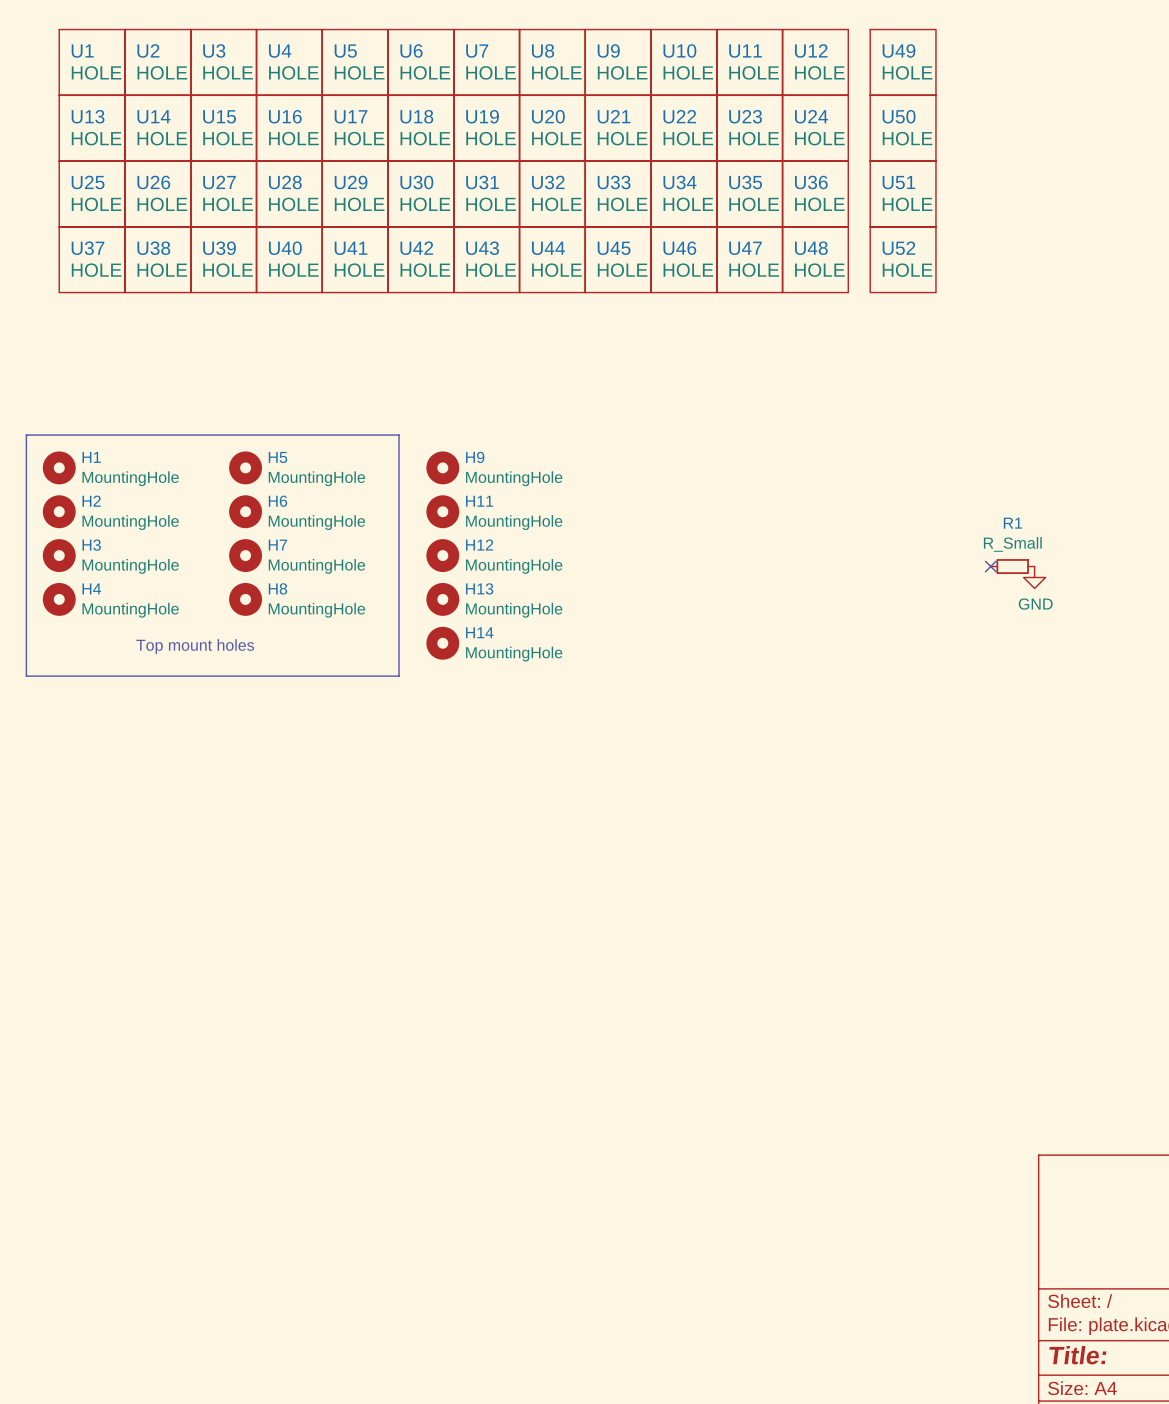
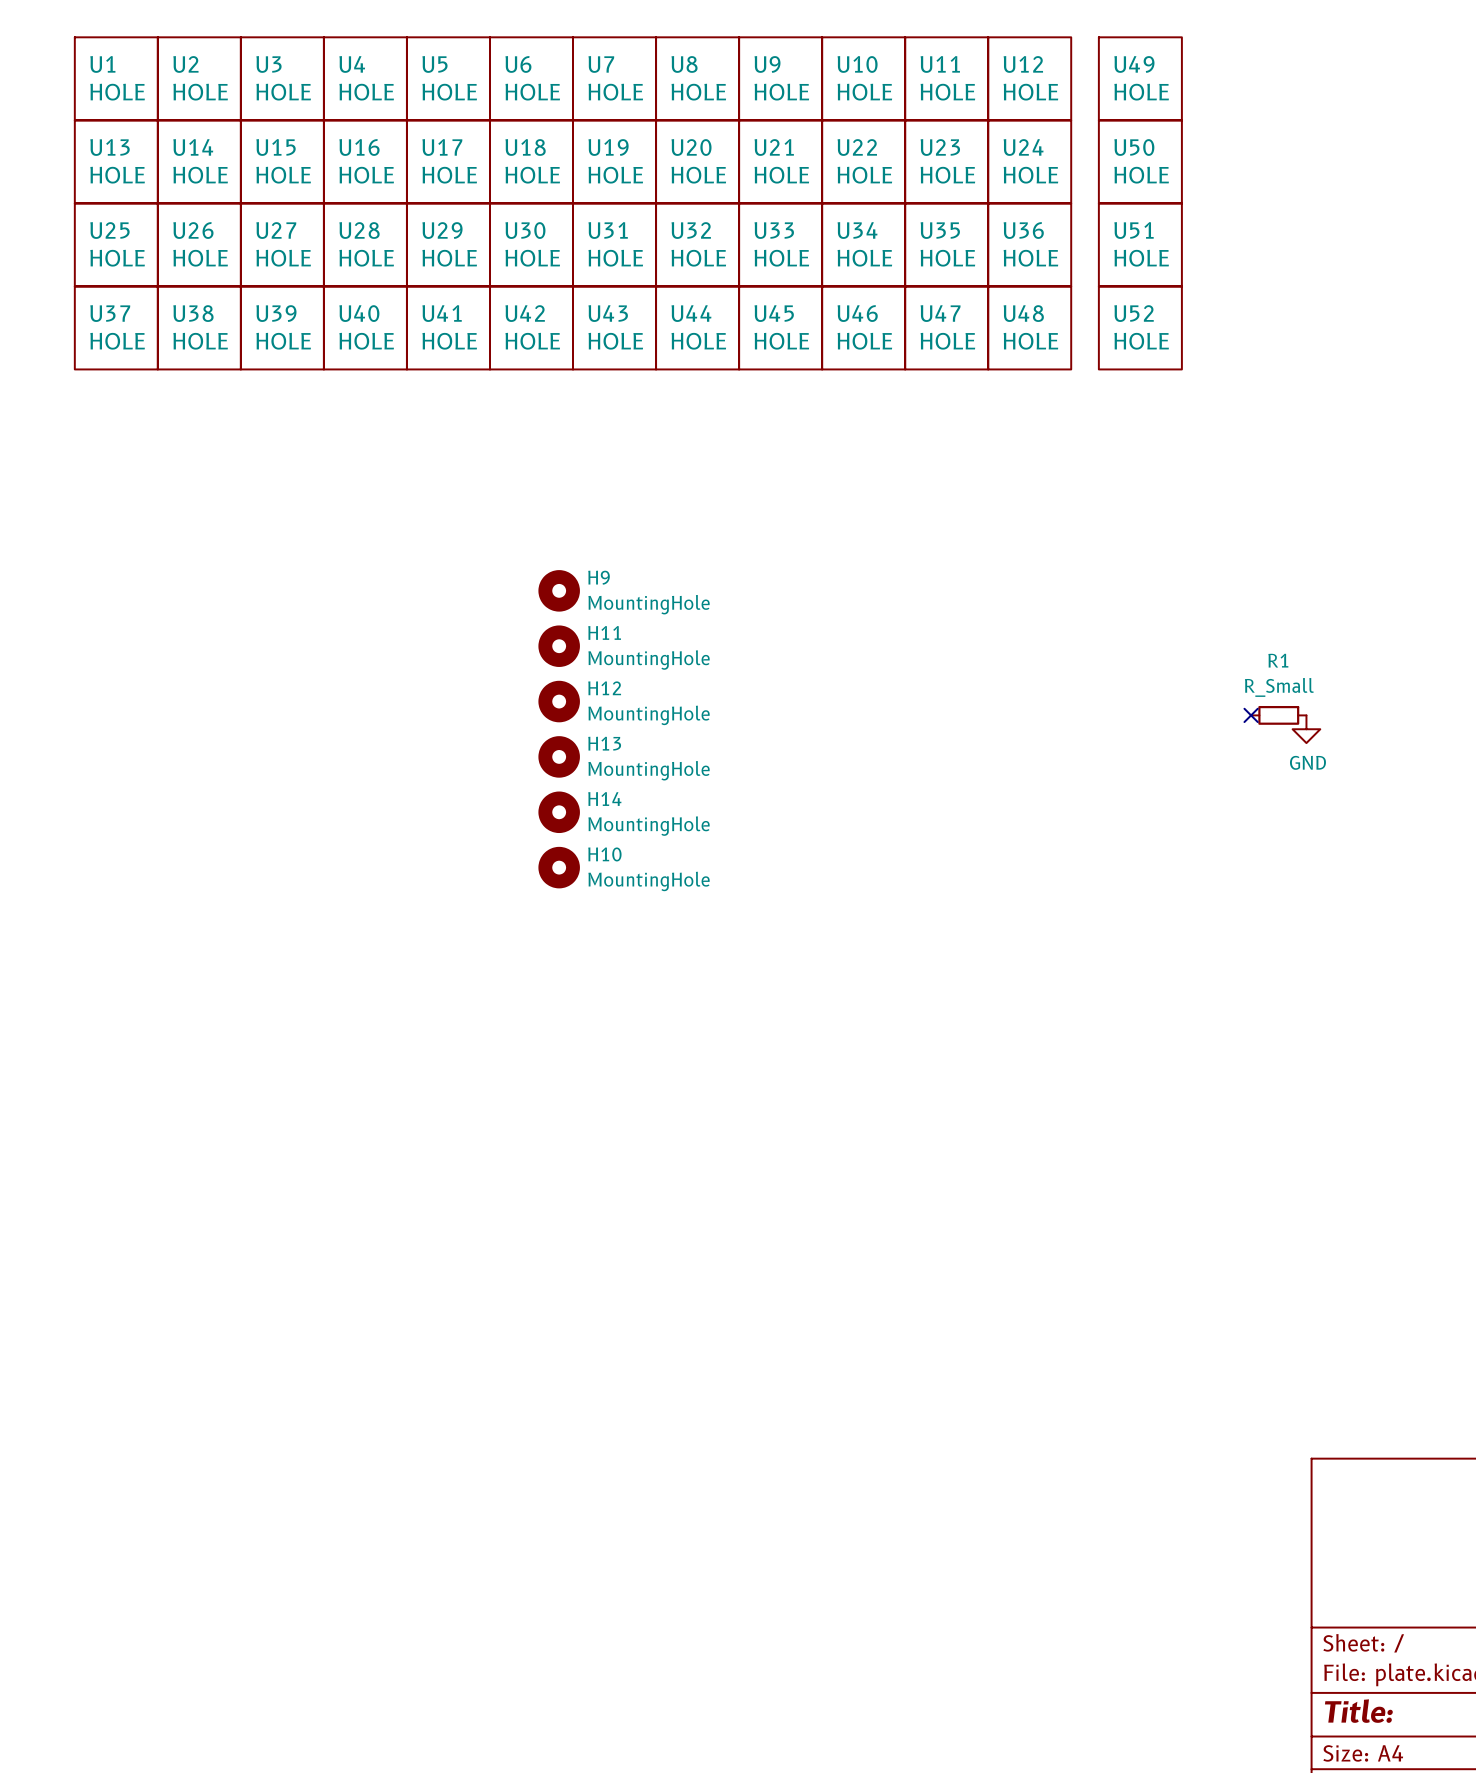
line: (26, 435) (26, 676) (398, 676) (398, 435) (26, 435) -> none
H1: MountingHole (59, 467) -> none
H5: MountingHole (245, 467) -> none
H2: MountingHole (59, 511) -> none
H6: MountingHole (245, 511) -> none
H3: MountingHole (59, 555) -> none
H7: MountingHole (245, 555) -> none
H4: MountingHole (59, 599) -> none
H8: MountingHole (245, 599) -> none
text: Top mount holes (195, 646) -> none
H10: none -> MountingHole (559, 867)

